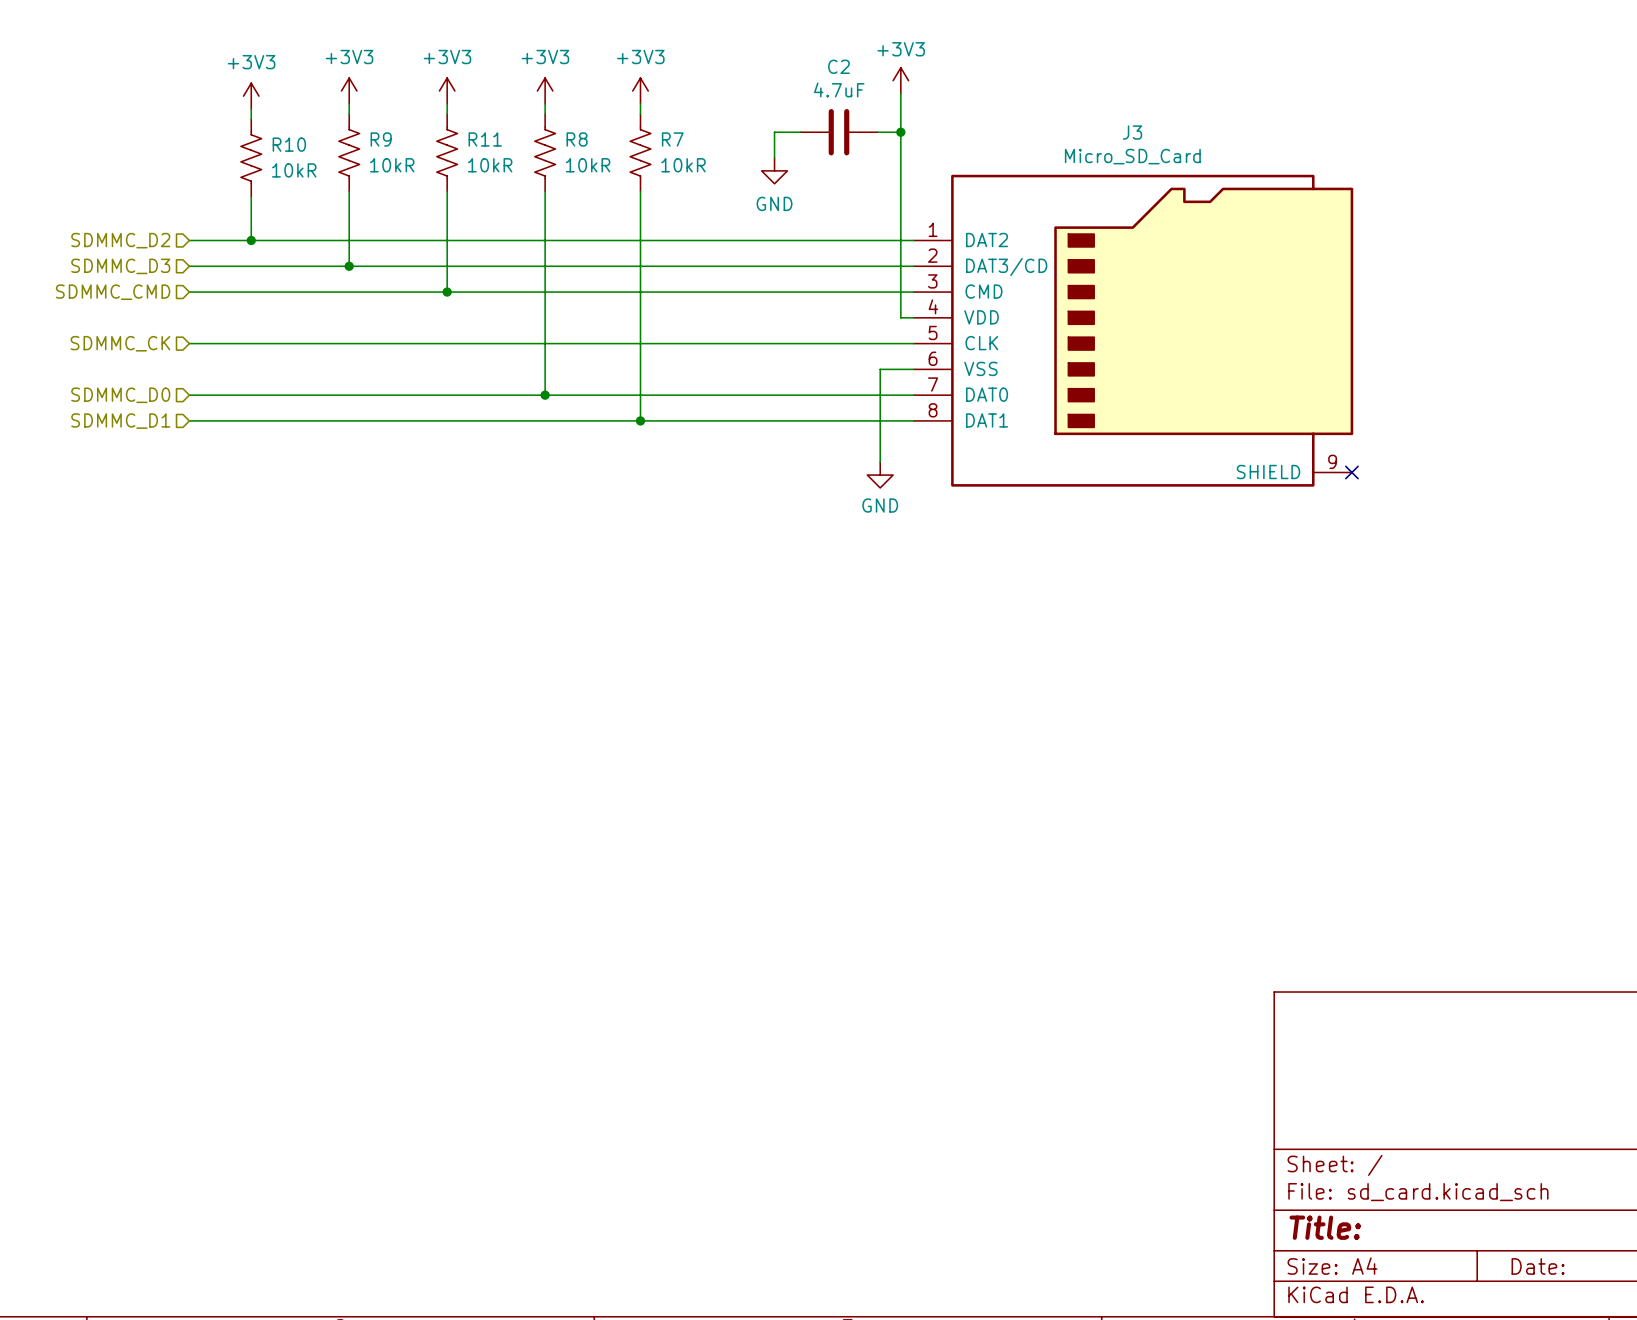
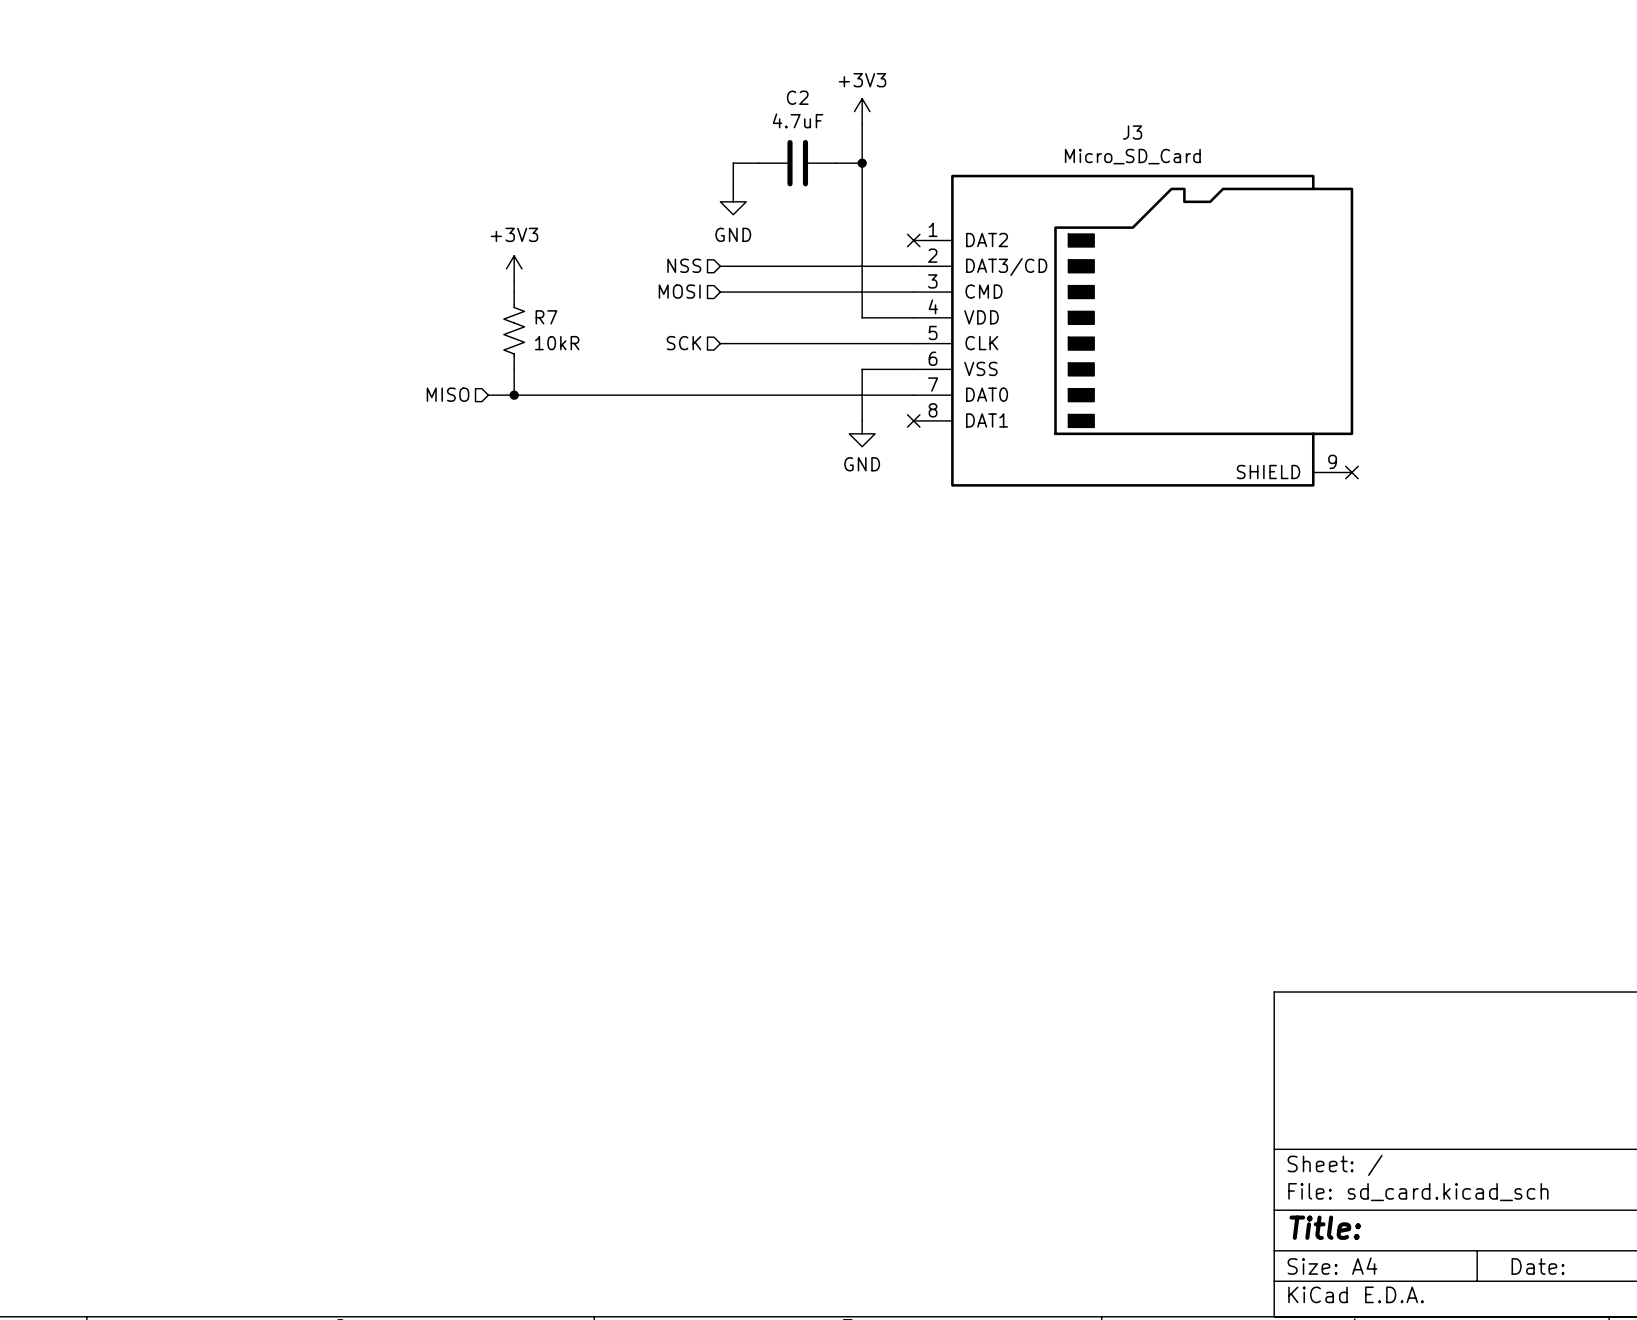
power symbol position: +3V3 (900, 80) -> +3V3 (862, 111)
power symbol: +3V3 (349, 90) -> none
power symbol: +3V3 (447, 90) -> none
power symbol: +3V3 (545, 90) -> none
power symbol: +3V3 (640, 90) -> none
wire: (900, 93) (900, 317) -> (862, 124) (862, 317) (900, 317)
power symbol: +3V3 (251, 96) -> none
wire: (349, 103) (349, 114) -> none
wire: (447, 103) (447, 114) -> none
wire: (545, 103) (545, 114) -> (514, 281) (514, 292)
wire: (640, 103) (640, 114) -> none
wire: (251, 109) (251, 119) -> none
wire: (800, 132) (774, 132) (774, 158) -> (759, 163) (733, 163) (733, 188)
C2 position: (838, 132) -> (797, 163)
wire: (877, 132) (900, 132) -> none
junction position: (900, 132) -> (862, 163)
R9: 10kR (349, 152) -> none
R11: 10kR (447, 152) -> none
R8: 10kR (545, 152) -> none
R7 position: (640, 152) -> (514, 330)
R10: 10kR (251, 158) -> none
wire: none -> (836, 163) (862, 163)
power symbol position: GND (774, 170) -> GND (733, 201)
wire: (349, 191) (349, 266) -> none
wire: (447, 191) (447, 292) -> none
wire: (545, 191) (545, 395) -> none
wire: (640, 191) (640, 420) -> none
wire: (251, 196) (251, 240) -> none
hierarchical label: SDMMC_D2 (120, 240) -> none
wire: (189, 240) (913, 240) -> none
junction: (251, 240) -> none
no-connect mark: none -> (913, 240)
hierarchical label: none -> NSS (684, 265)
hierarchical label: SDMMC_D3 (120, 266) -> none
wire: (189, 266) (720, 266) -> none
junction: (349, 266) -> none
power symbol: none -> +3V3 (514, 268)
hierarchical label: none -> MOSI (679, 291)
hierarchical label: SDMMC_CMD (113, 292) -> none
wire: (189, 292) (720, 292) -> none
junction: (447, 292) -> none
hierarchical label: SDMMC_CK (120, 343) -> none
wire: (189, 343) (720, 343) -> none
hierarchical label: none -> SCK (683, 343)
wire: none -> (514, 369) (514, 395)
wire: (880, 369) (880, 462) -> (880, 369) (862, 369) (862, 420)
hierarchical label: none -> MISO (448, 394)
hierarchical label: SDMMC_D0 (120, 395) -> none
wire: (189, 395) (488, 395) -> none
junction position: (545, 395) -> (514, 395)
wire: (189, 420) (913, 420) -> none
junction: (640, 420) -> none
no-connect mark: none -> (913, 420)
hierarchical label: SDMMC_D1 (120, 421) -> none
power symbol position: GND (880, 475) -> GND (862, 433)

